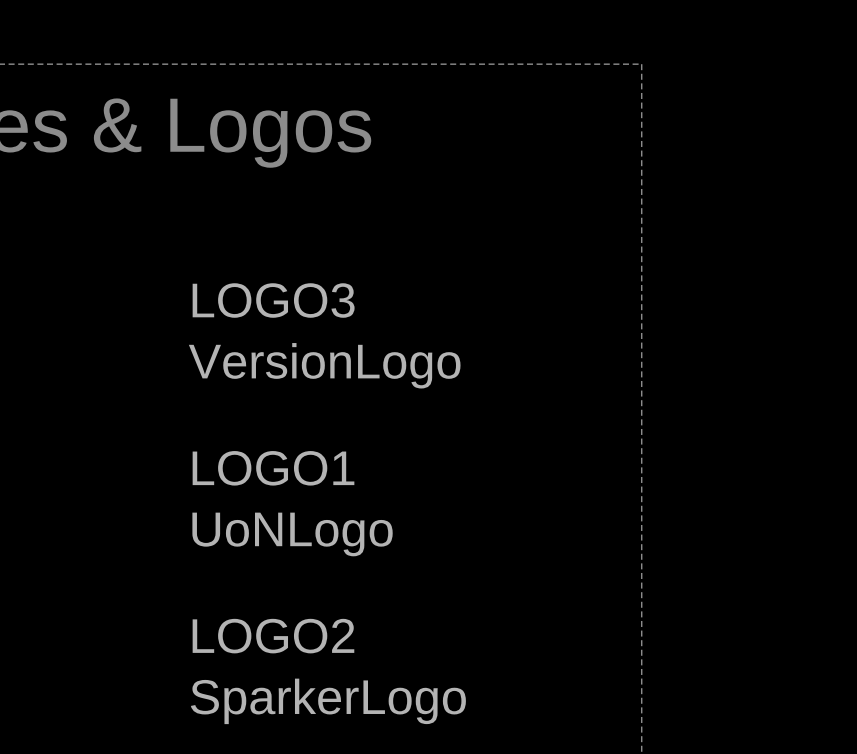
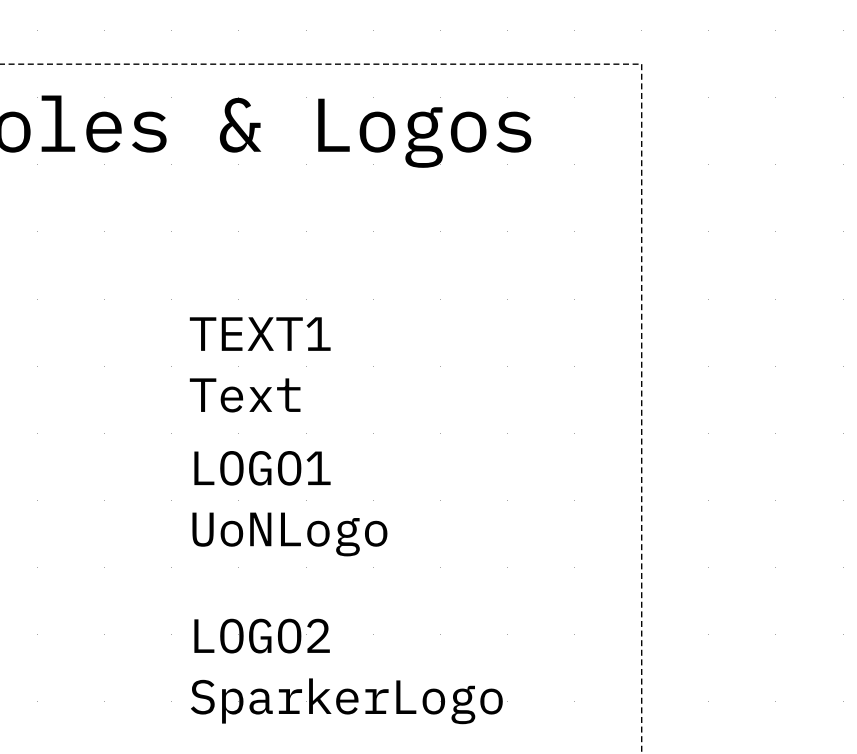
LOGO3: VersionLogo (324, 335) -> none
TEXT1: none -> Text (260, 364)

